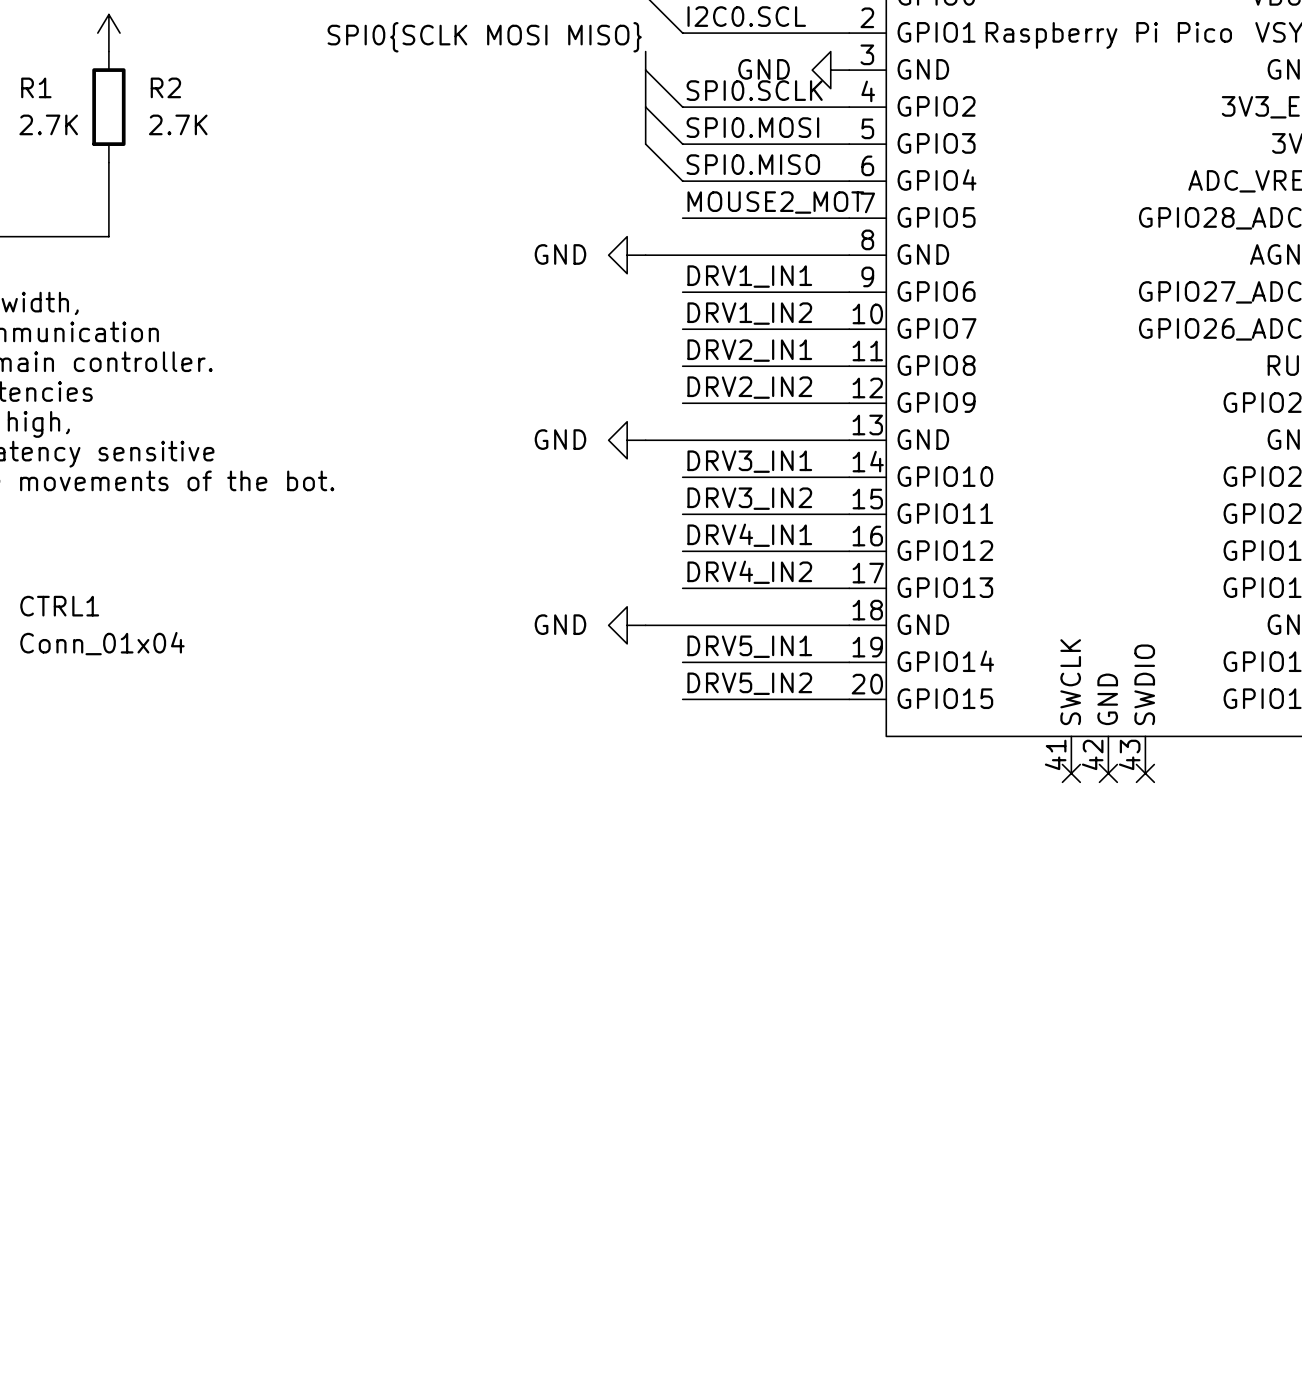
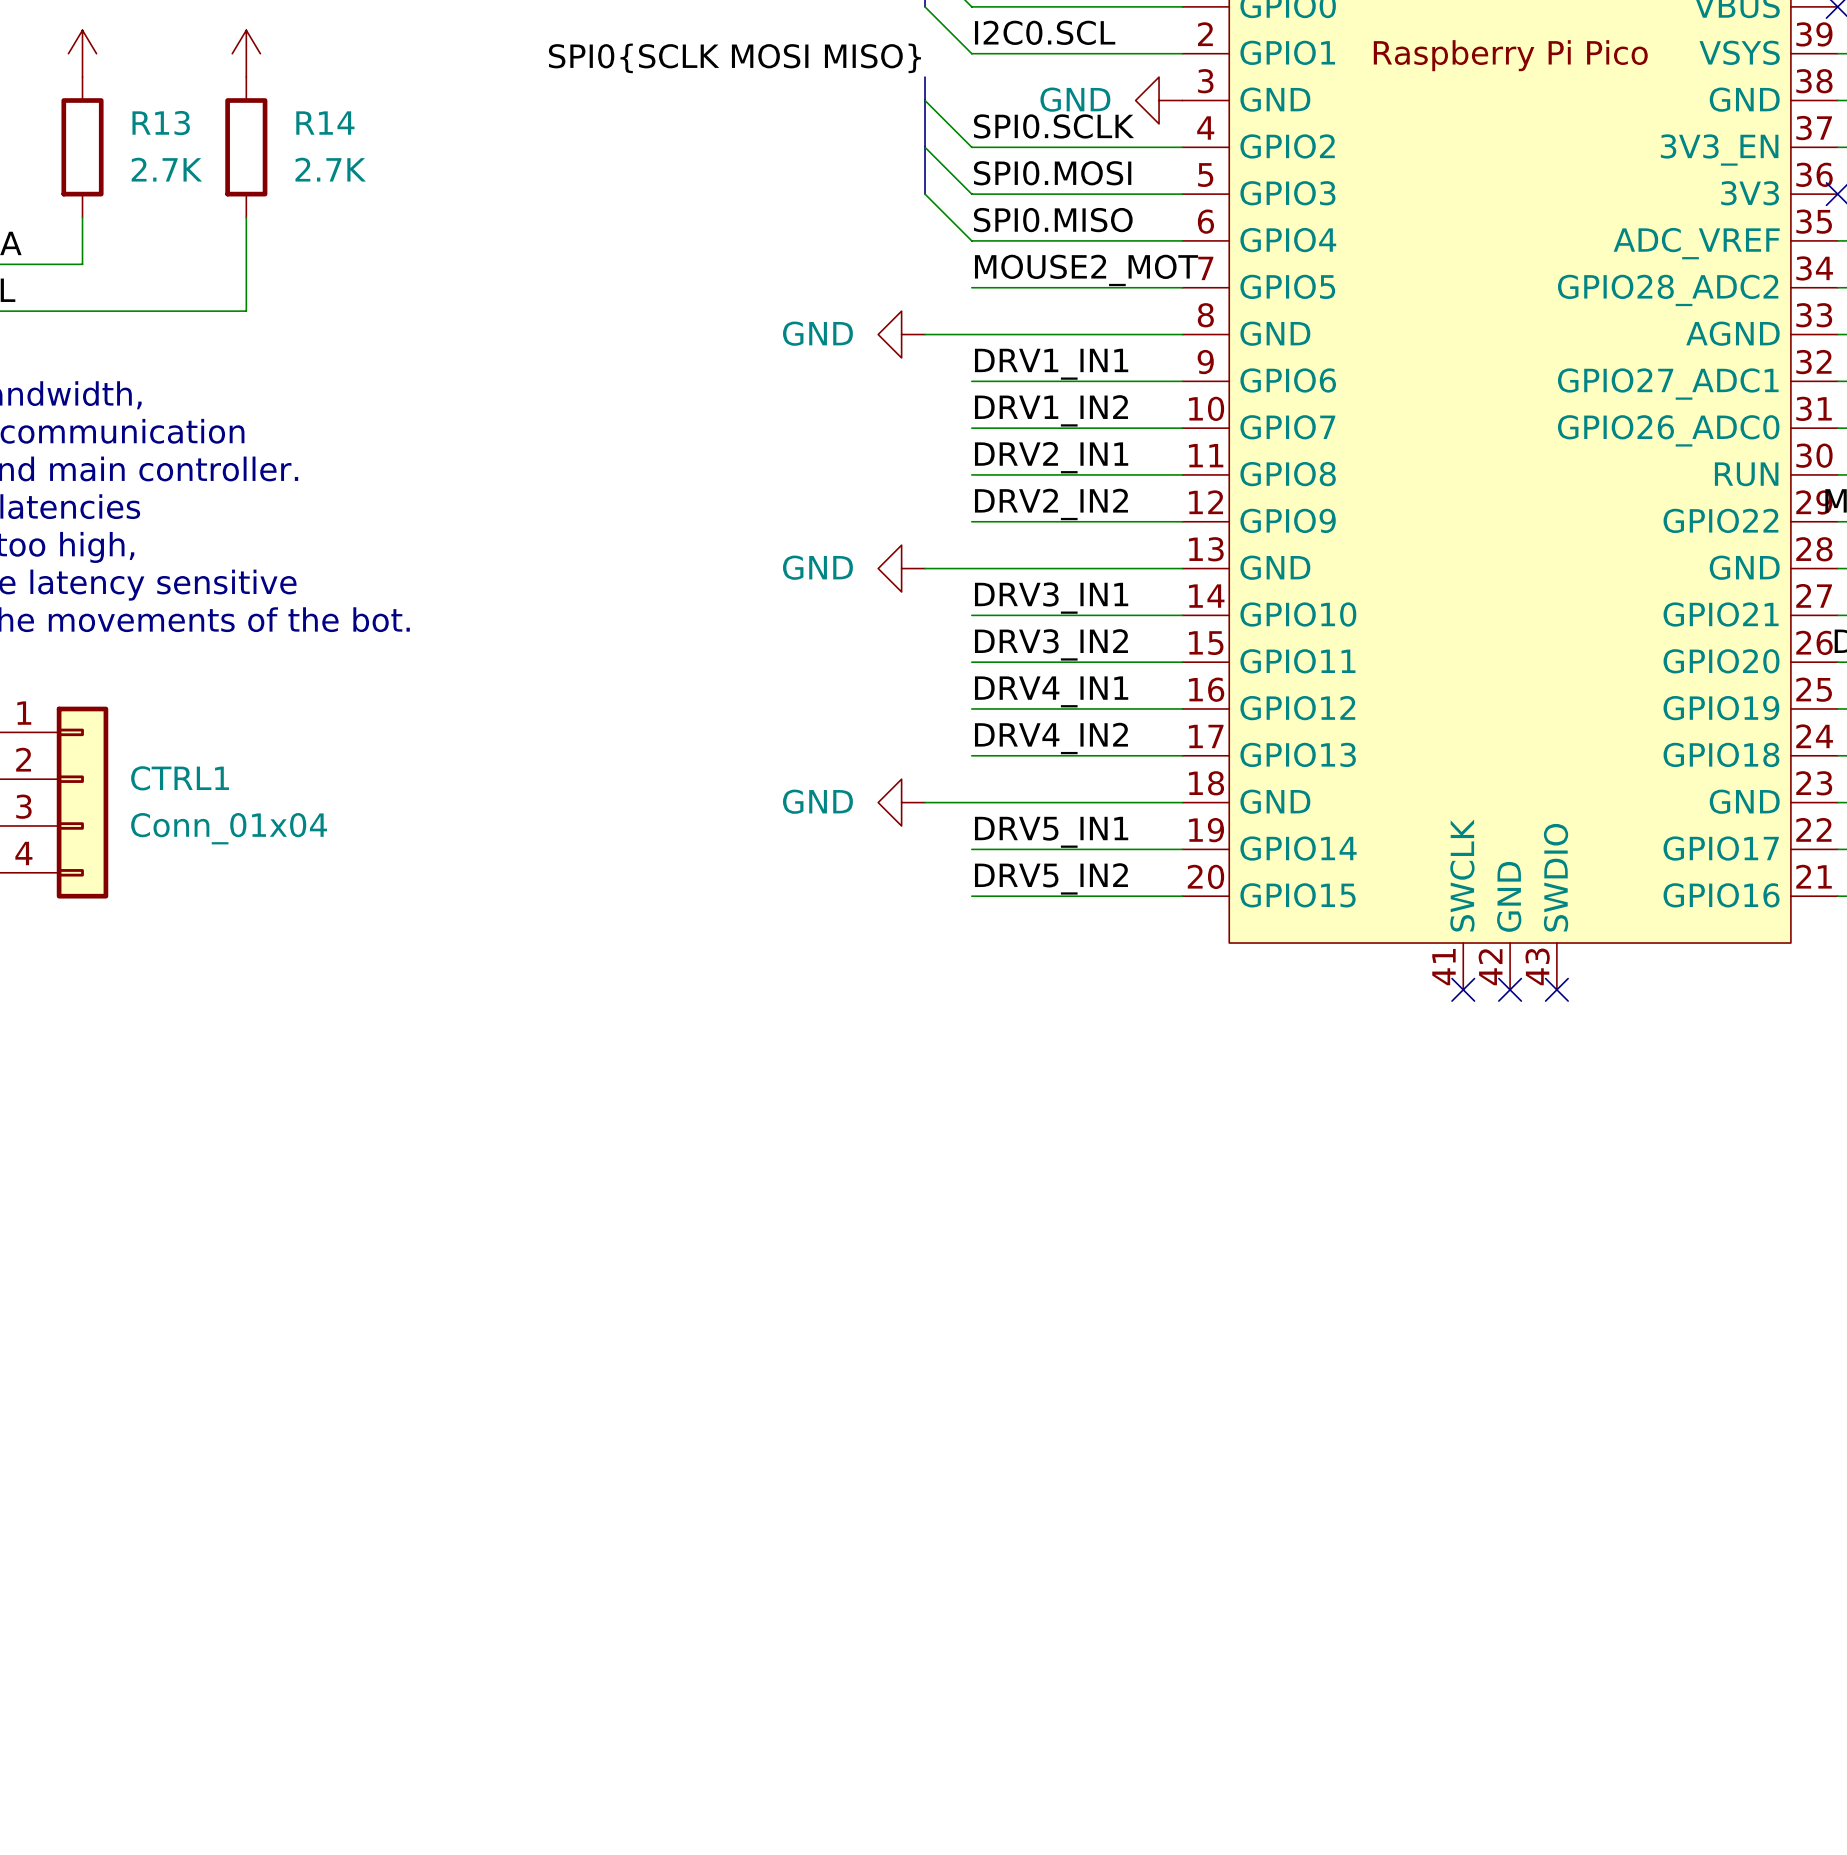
R1 name: R1 (36, 87) -> R13 (161, 123)
R2 name: R2 (165, 87) -> R14 (325, 123)

